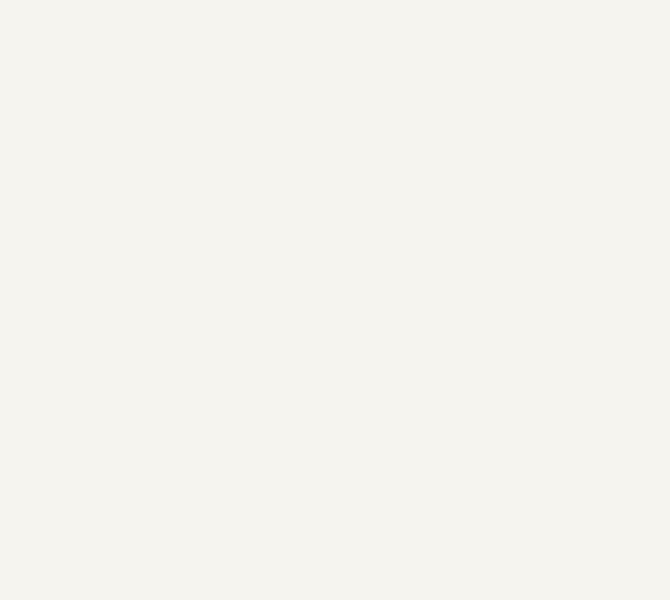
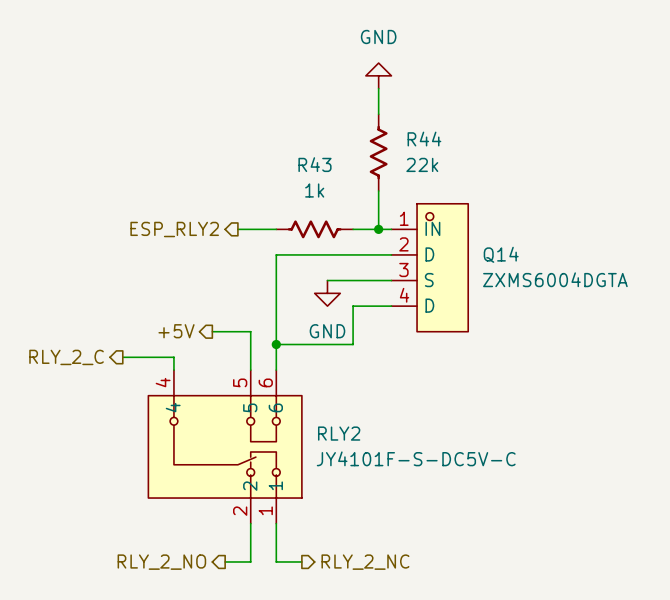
power symbol: none -> GND (378, 75)
wire: none -> (378, 88) (378, 114)
R44: none -> 22k (378, 152)
wire: none -> (378, 190) (378, 229)
hierarchical label: none -> ESP_RLY2 (174, 229)
wire: none -> (237, 229) (276, 229)
R43: none -> 1k (314, 229)
wire: none -> (353, 229) (391, 229)
junction: none -> (378, 229)
wire: none -> (391, 254) (276, 254) (276, 370)
Q14: none -> ZXMS6004DGTA (429, 267)
wire: none -> (327, 280) (391, 280)
power symbol: none -> GND (327, 293)
wire: none -> (391, 306) (353, 306) (353, 344) (276, 344)
hierarchical label: none -> +5V (176, 331)
wire: none -> (212, 331) (250, 331) (250, 370)
junction: none -> (276, 344)
hierarchical label: none -> RLY_2_C (66, 357)
wire: none -> (122, 357) (173, 357) (173, 370)
RLY2: none -> JY4101F-S-DC5V-C (225, 446)
wire: none -> (250, 523) (250, 561) (225, 561)
wire: none -> (276, 523) (276, 561) (301, 561)
hierarchical label: none -> RLY_2_NO (161, 562)
hierarchical label: none -> RLY_2_NC (365, 562)

